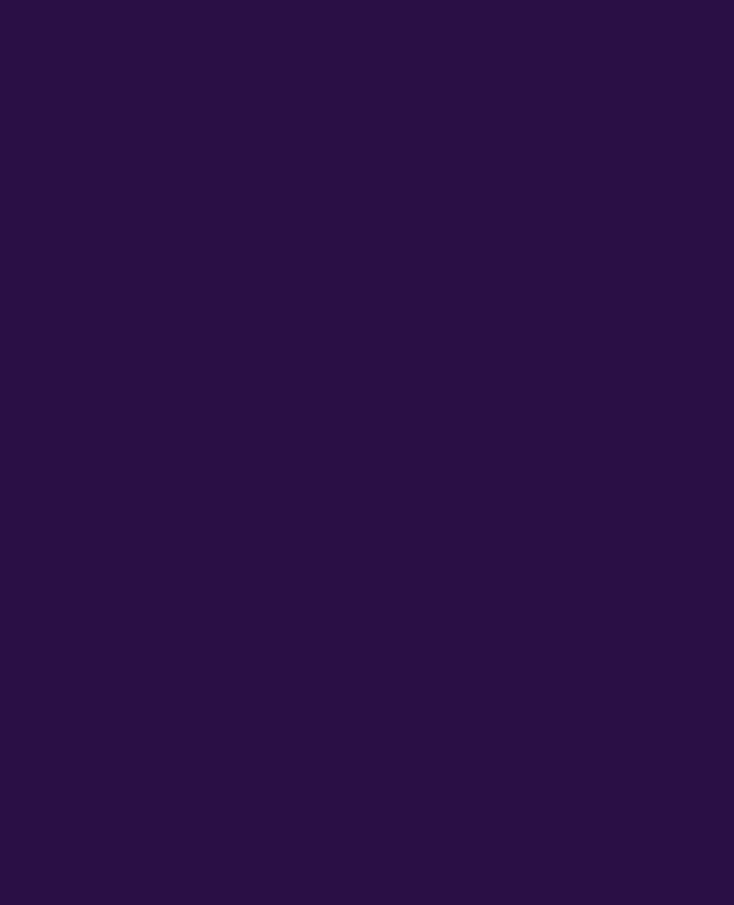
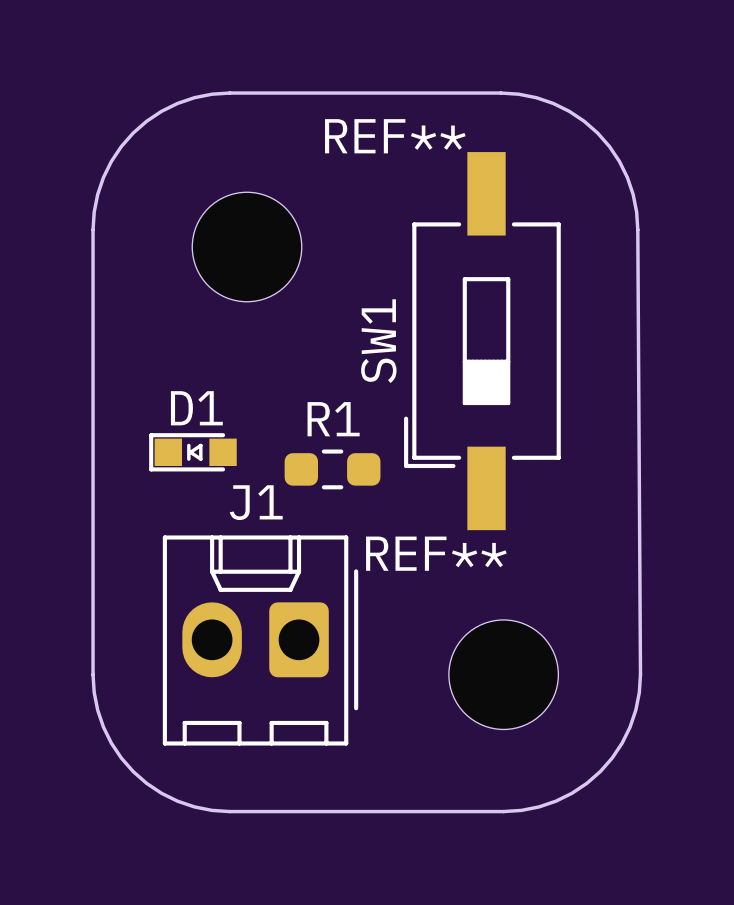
board edge: none -> (229, 93) (500, 93) (536, 97) (569, 111) (597, 133) (619, 161) (627, 177) (633, 194) (637, 229) (639, 692) (630, 727) (612, 758) (586, 783) (556, 801) (539, 806) (503, 811) (212, 810) (177, 801) (146, 783) (121, 758) (103, 727) (97, 710) (93, 674) (93, 229) (97, 194) (103, 177) (121, 146) (146, 121) (177, 103) (194, 97) (229, 93)
REF**: none -> (247, 247)
SW1: none -> (482, 341)
D1: none -> (192, 452)
R1: none -> (332, 469)
J1: none -> (260, 640)
REF**: none -> (503, 674)

